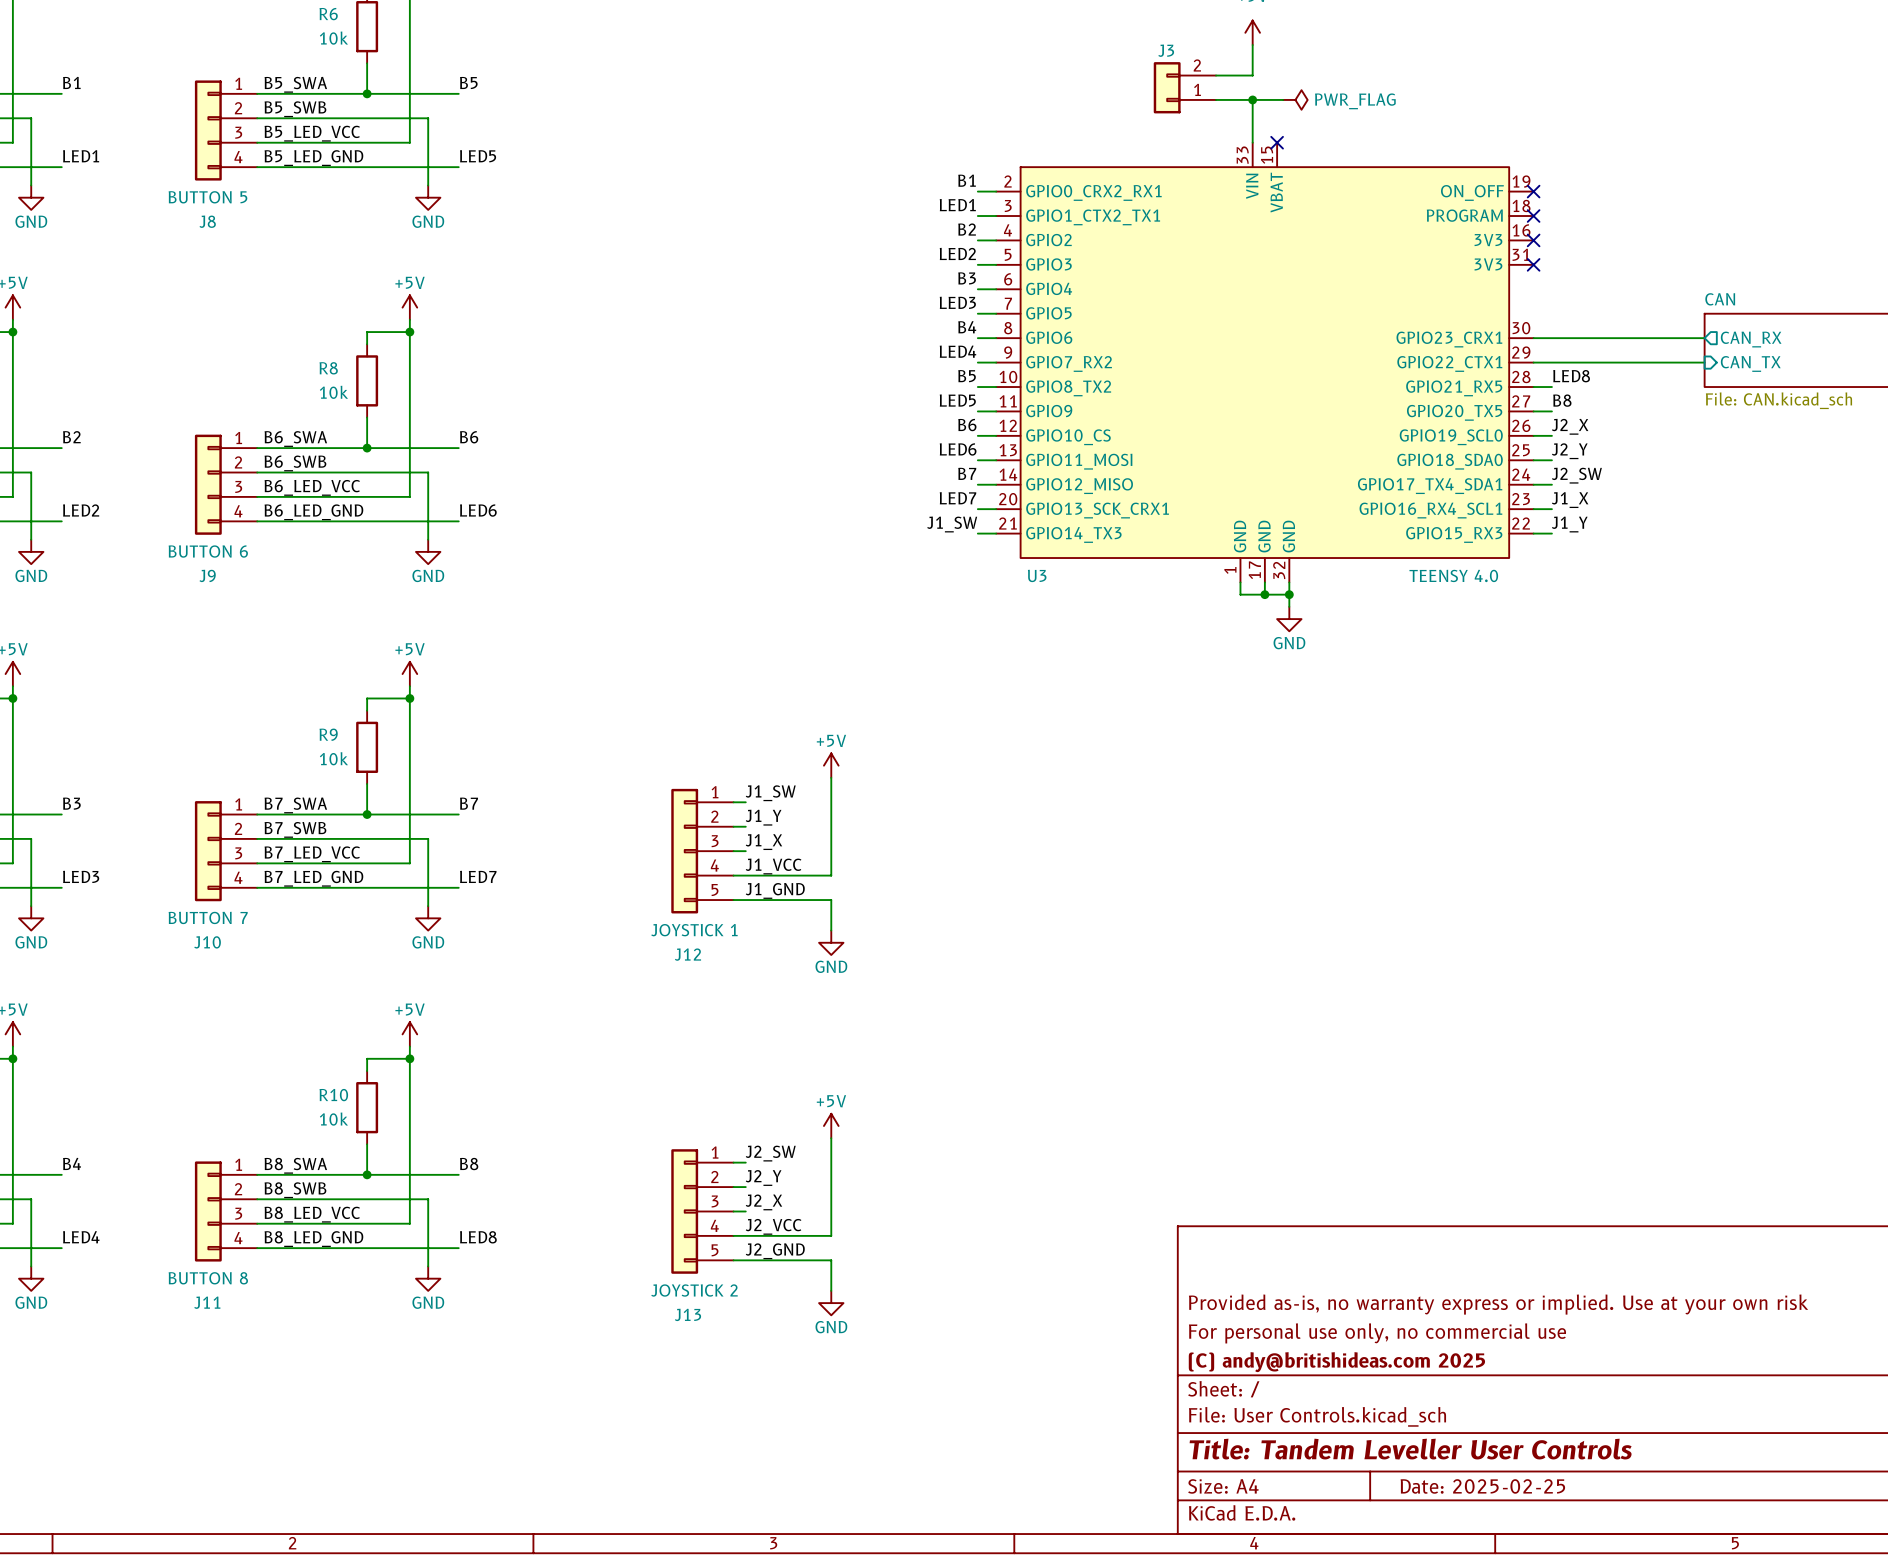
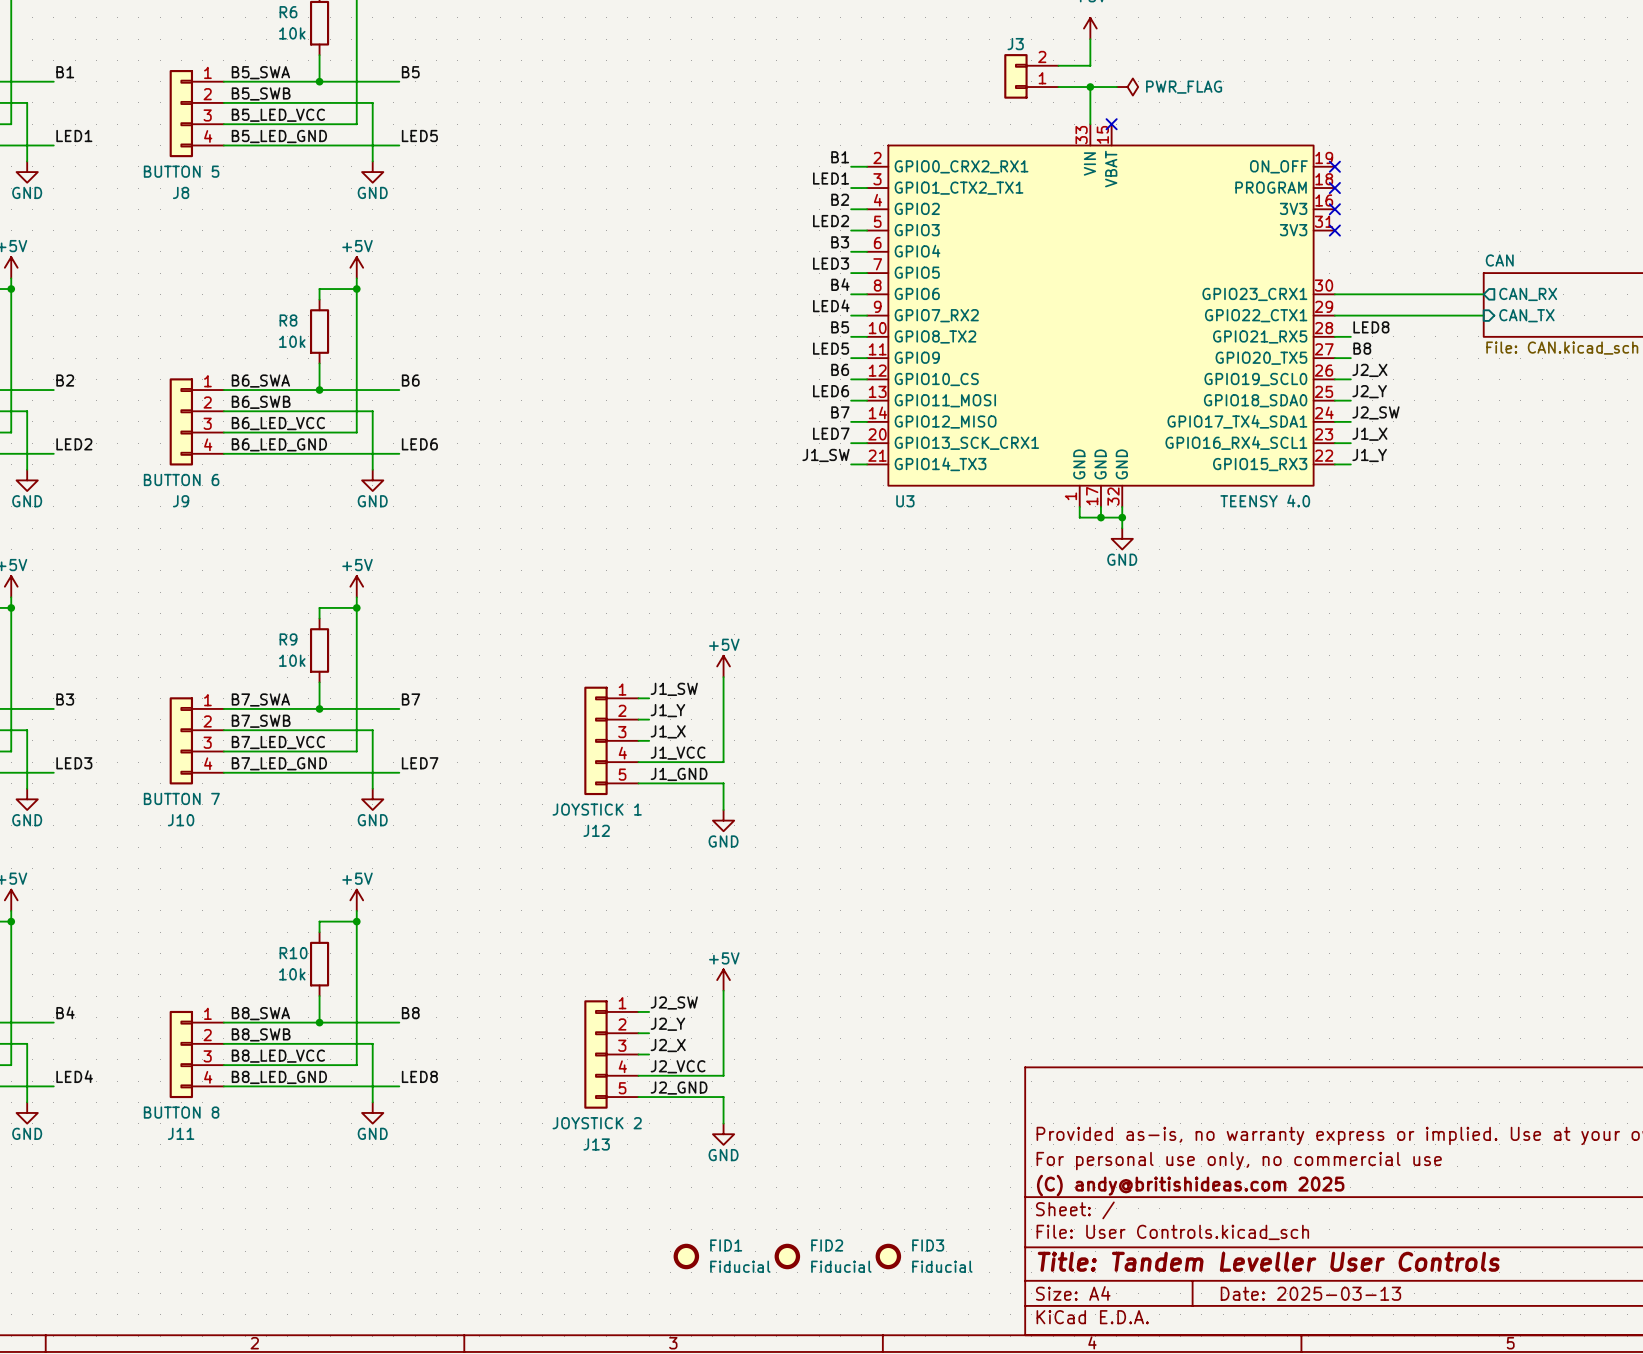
FID1: none -> Fiducial (686, 1256)
FID2: none -> Fiducial (787, 1256)
FID3: none -> Fiducial (888, 1256)
title block: Date: 2025-02-25 (1482, 1486) -> Date: 2025-03-13 (1310, 1293)

